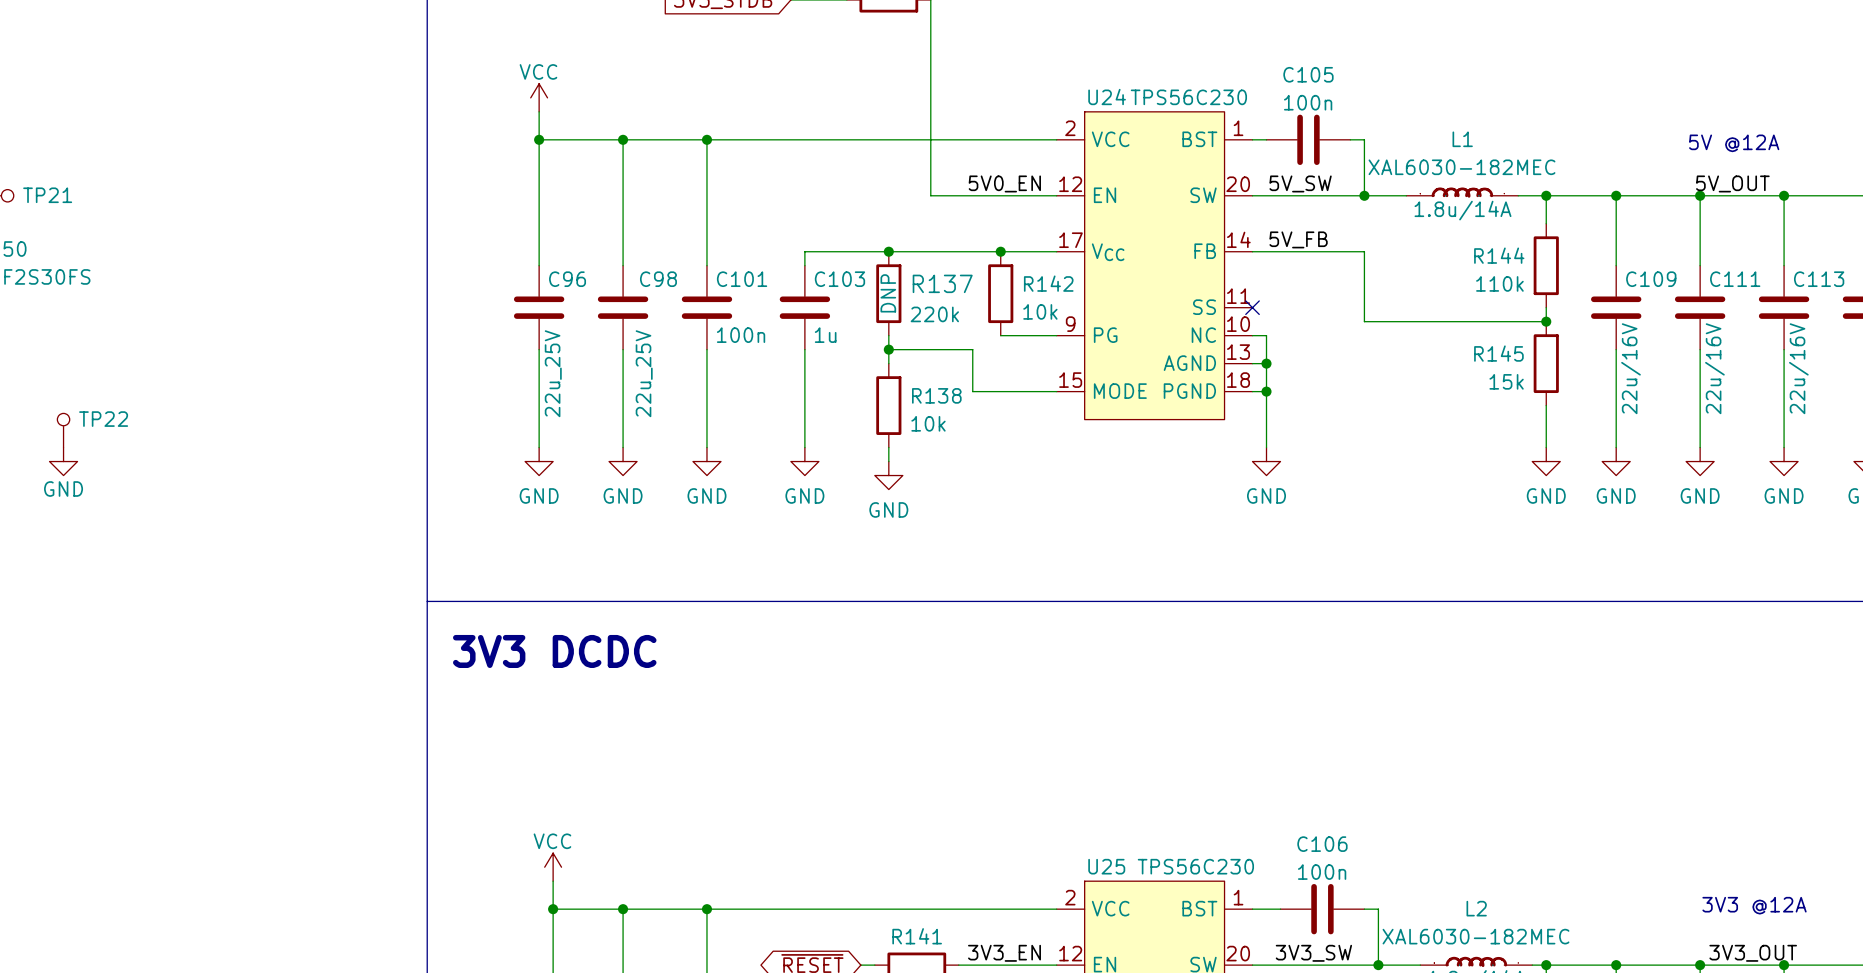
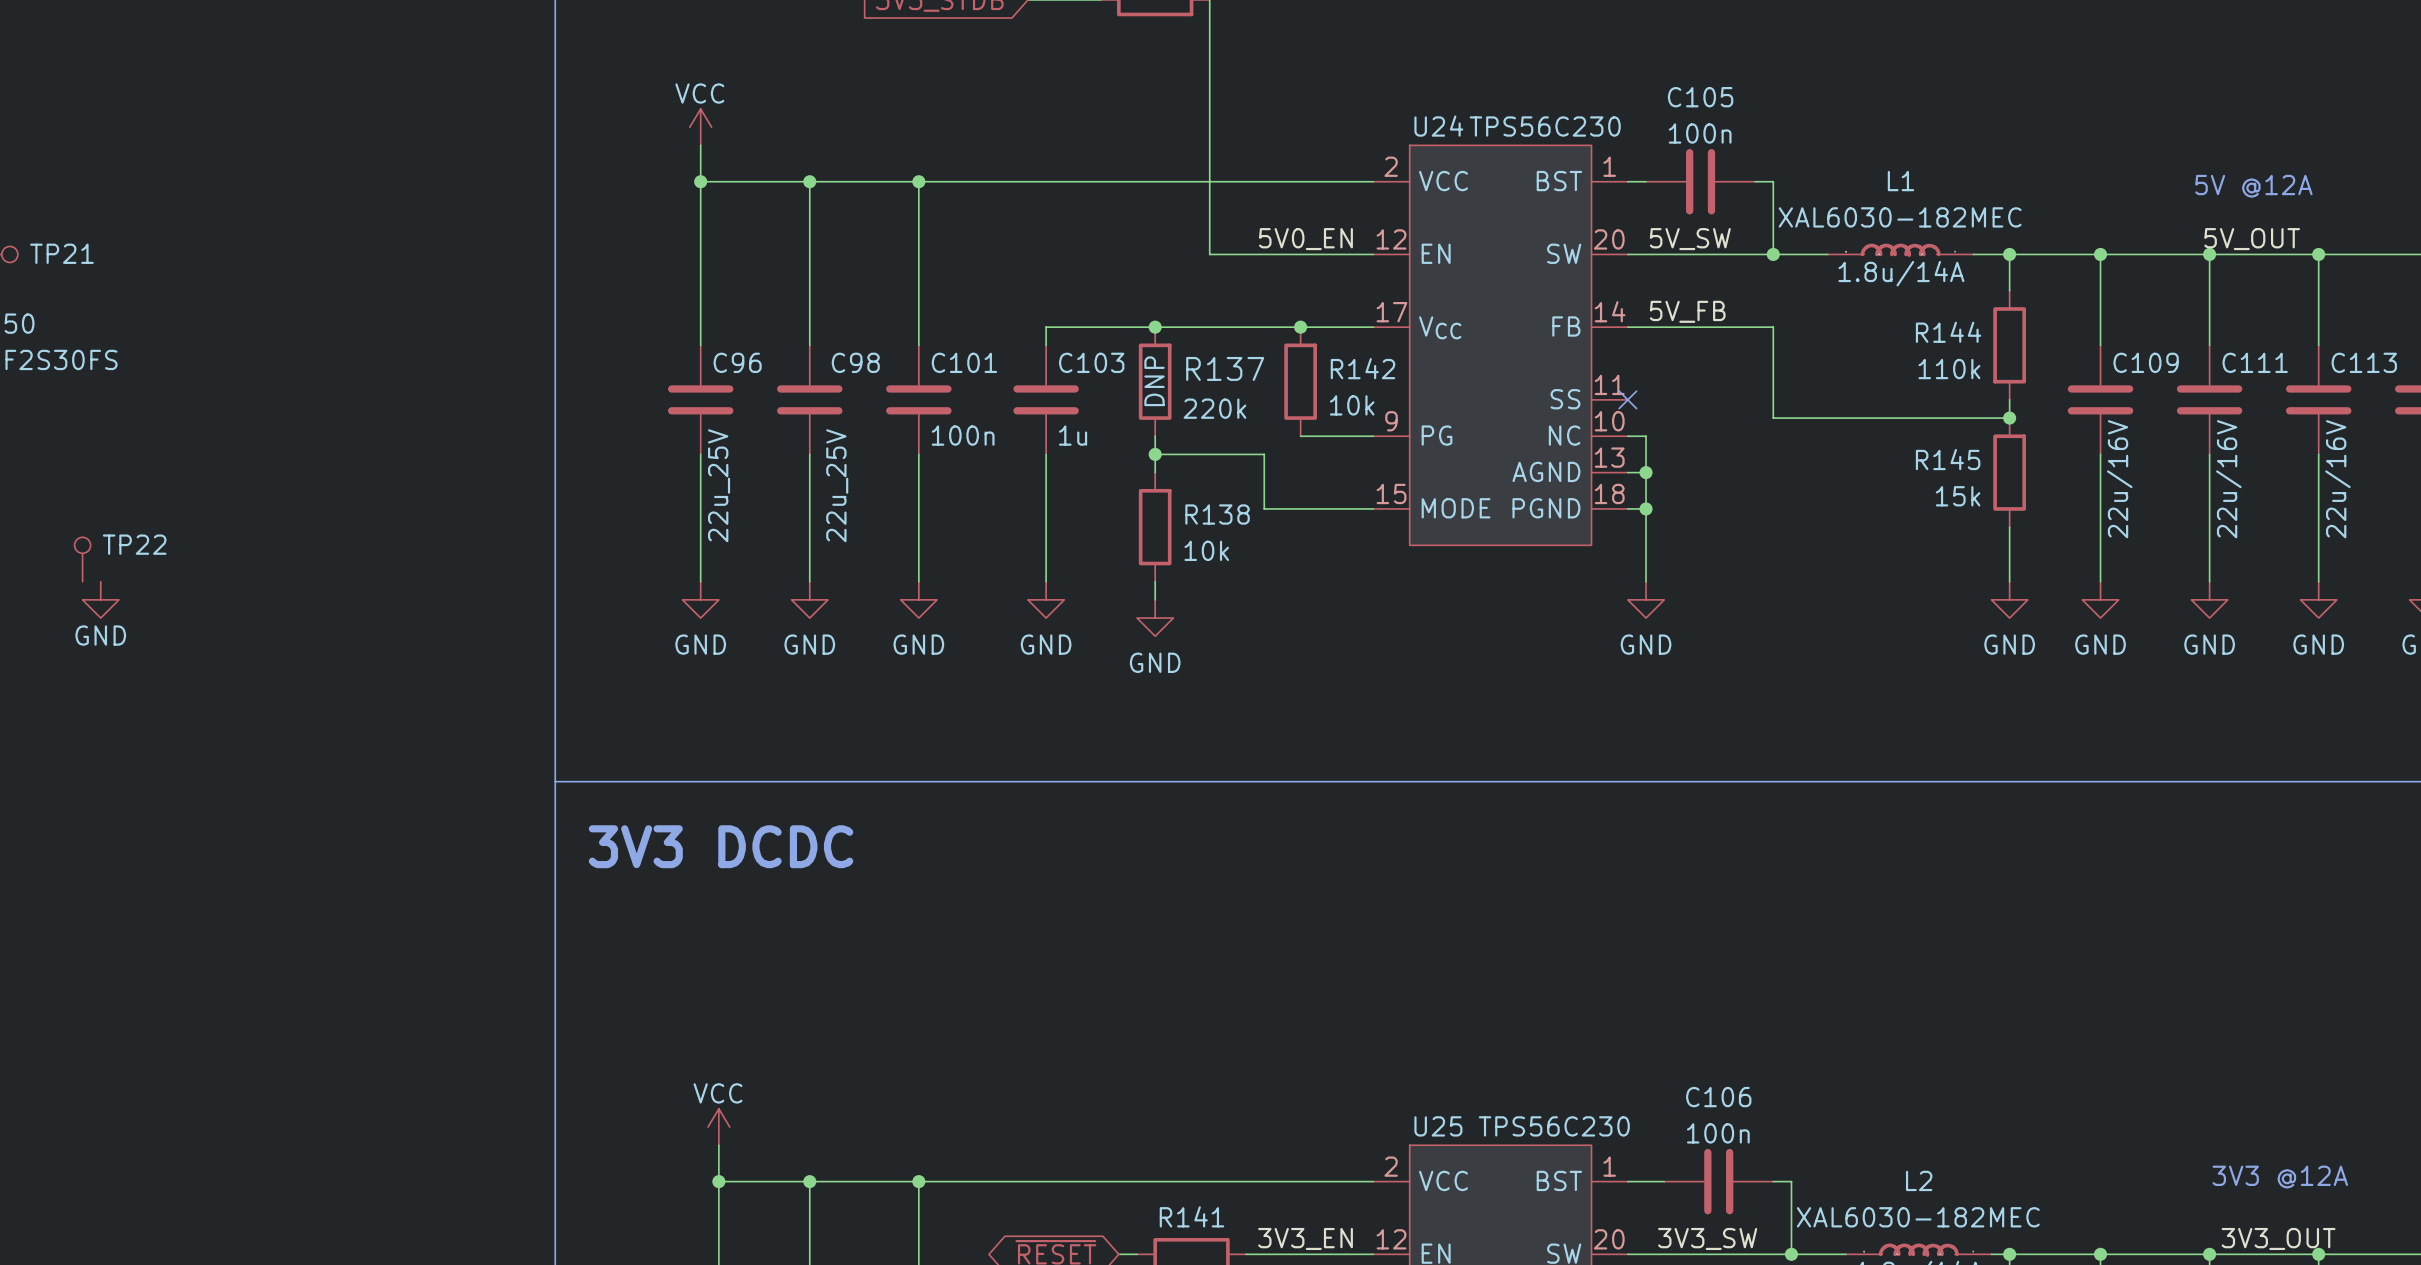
power symbol position: GND (63, 461) -> GND (100, 599)

